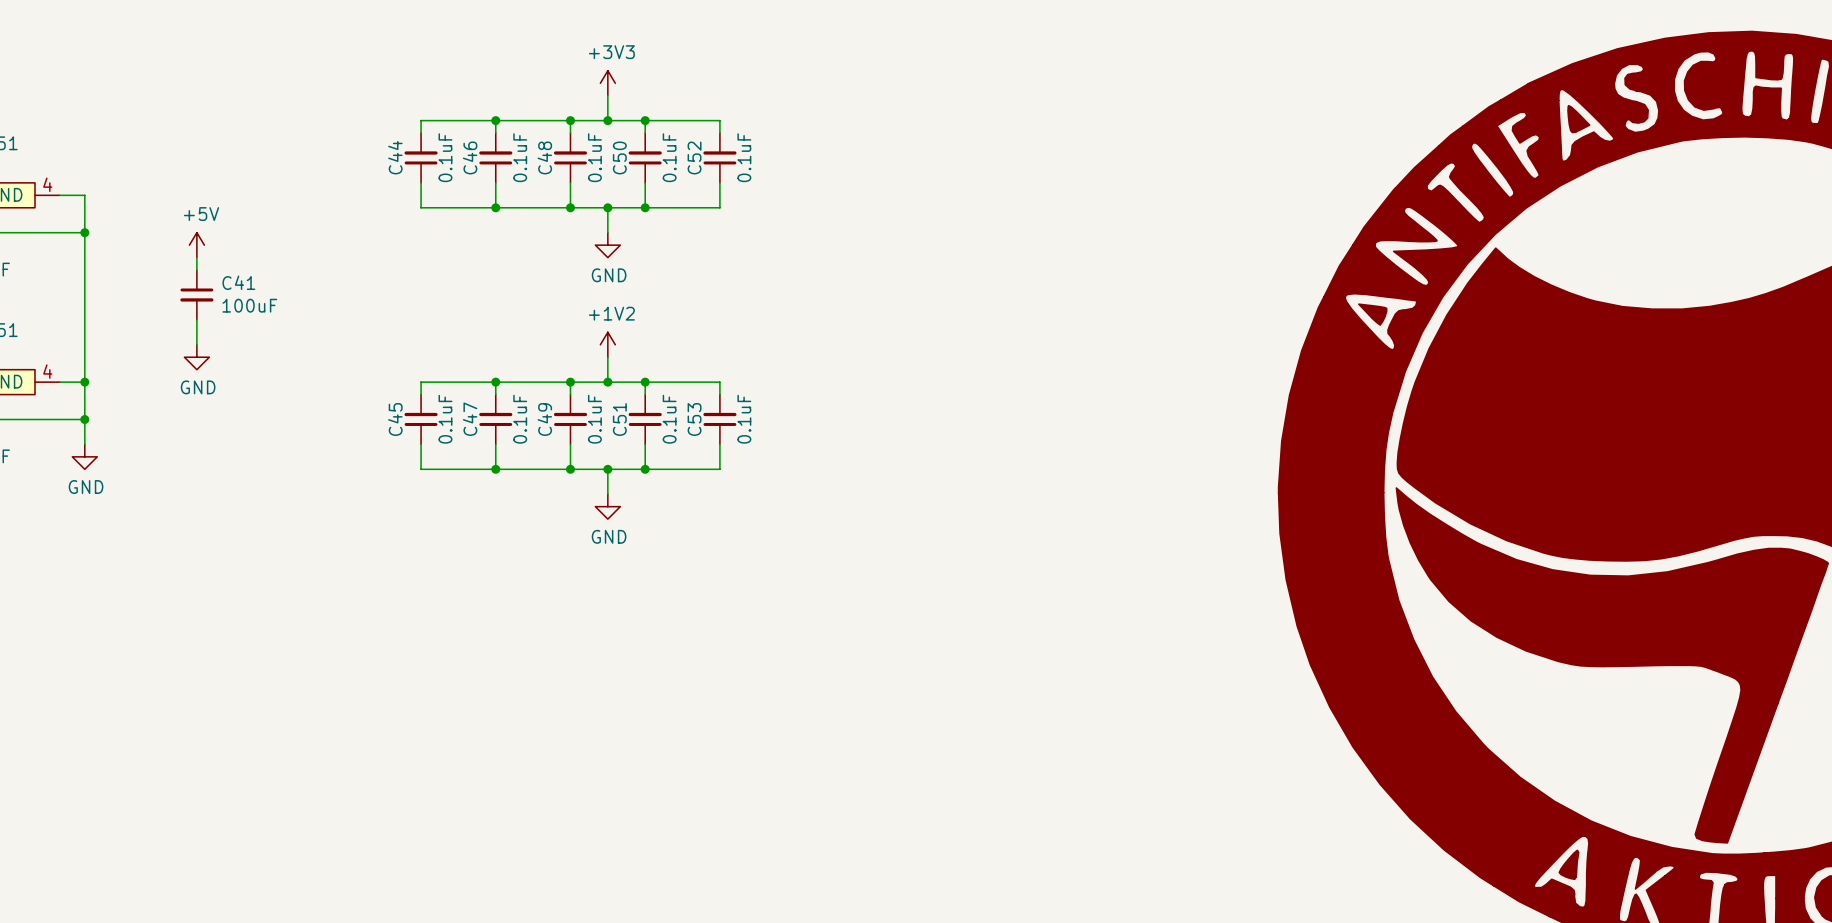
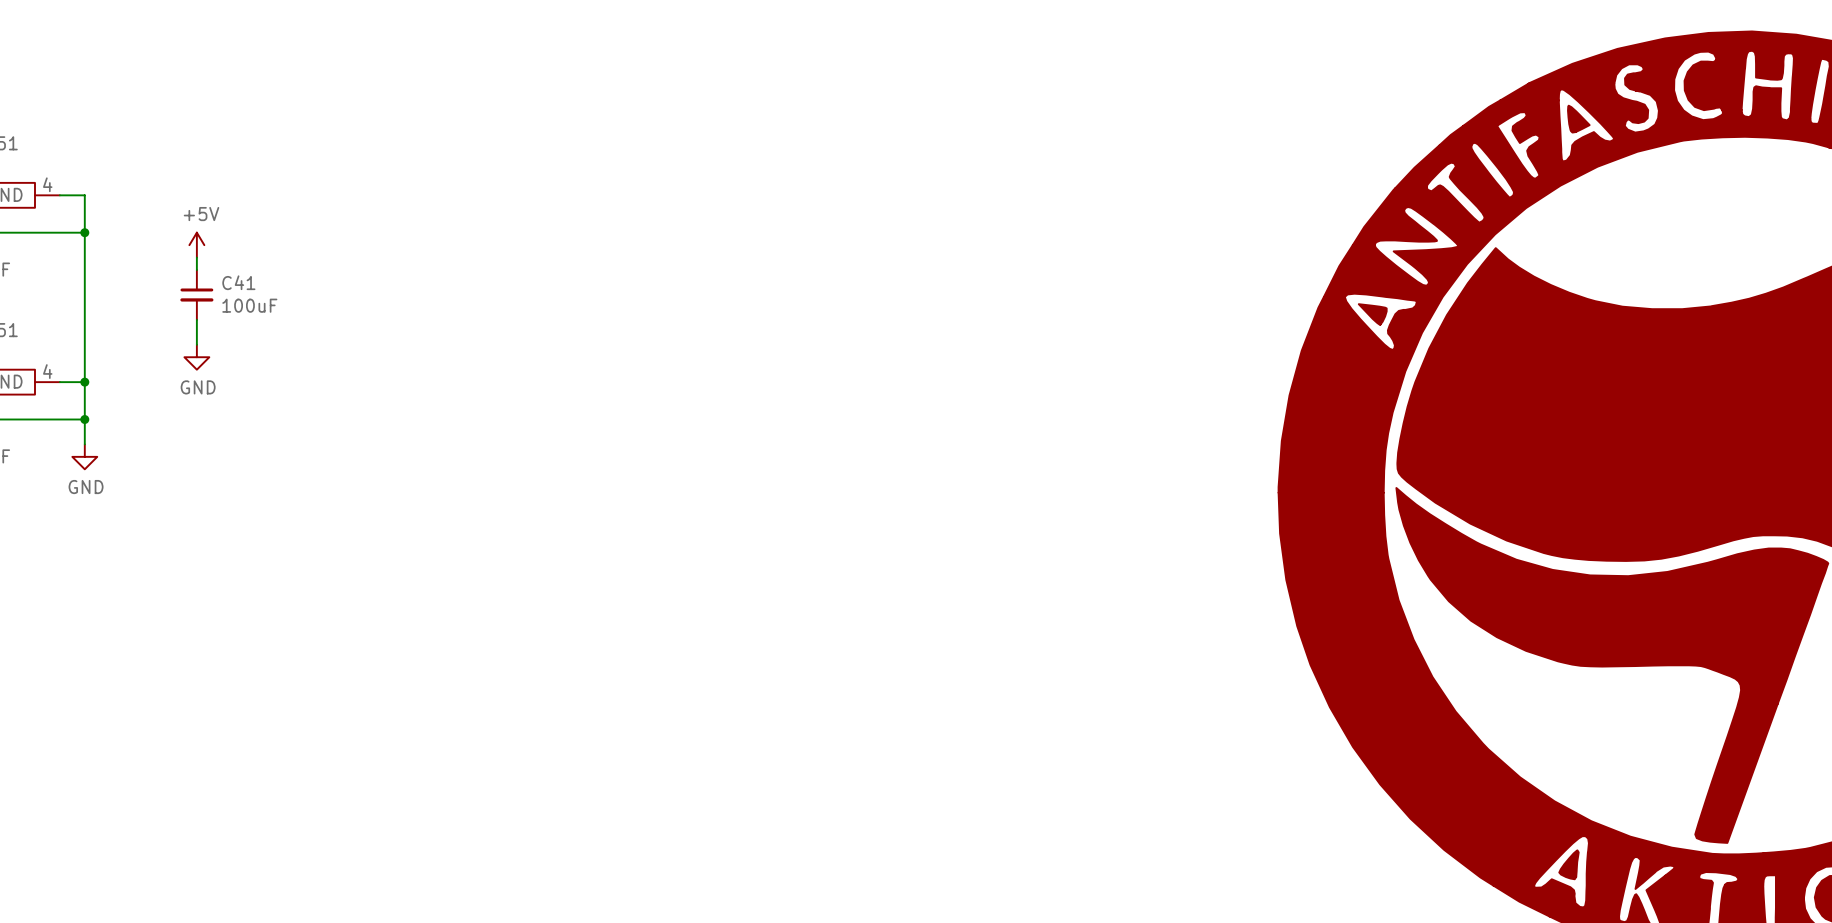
power symbol: +3V3 (607, 83) -> none
wire: (607, 95) (607, 120) -> none
wire: (495, 120) (495, 133) -> none
junction: (495, 120) -> none
wire: (570, 120) (570, 133) -> none
junction: (570, 120) -> none
junction: (607, 120) -> none
wire: (645, 120) (645, 133) -> none
junction: (645, 120) -> none
wire: (421, 133) (421, 120) (719, 120) (719, 133) -> none
C44: 0.1uF (421, 157) -> none
C46: 0.1uF (495, 157) -> none
C48: 0.1uF (570, 157) -> none
C50: 0.1uF (645, 157) -> none
C52: 0.1uF (719, 157) -> none
wire: (421, 182) (421, 207) (719, 207) (719, 182) -> none
wire: (495, 182) (495, 207) -> none
wire: (570, 182) (570, 207) -> none
wire: (645, 182) (645, 207) -> none
junction: (495, 207) -> none
junction: (570, 207) -> none
wire: (607, 207) (607, 232) -> none
junction: (607, 207) -> none
junction: (645, 207) -> none
power symbol: GND (607, 245) -> none
power symbol: +1V2 (607, 344) -> none
wire: (607, 357) (607, 382) -> none
wire: (495, 382) (495, 394) -> none
junction: (495, 382) -> none
wire: (570, 382) (570, 394) -> none
junction: (570, 382) -> none
junction: (607, 382) -> none
wire: (645, 382) (645, 394) -> none
junction: (645, 382) -> none
wire: (421, 394) (421, 382) (719, 382) (719, 394) -> none
C45: 0.1uF (421, 419) -> none
C47: 0.1uF (495, 419) -> none
C49: 0.1uF (570, 419) -> none
C51: 0.1uF (645, 419) -> none
C53: 0.1uF (719, 419) -> none
wire: (421, 444) (421, 469) (719, 469) (719, 444) -> none
wire: (495, 444) (495, 469) -> none
wire: (570, 444) (570, 469) -> none
wire: (645, 444) (645, 469) -> none
junction: (495, 469) -> none
junction: (570, 469) -> none
wire: (607, 469) (607, 494) -> none
junction: (607, 469) -> none
junction: (645, 469) -> none
power symbol: GND (607, 506) -> none

